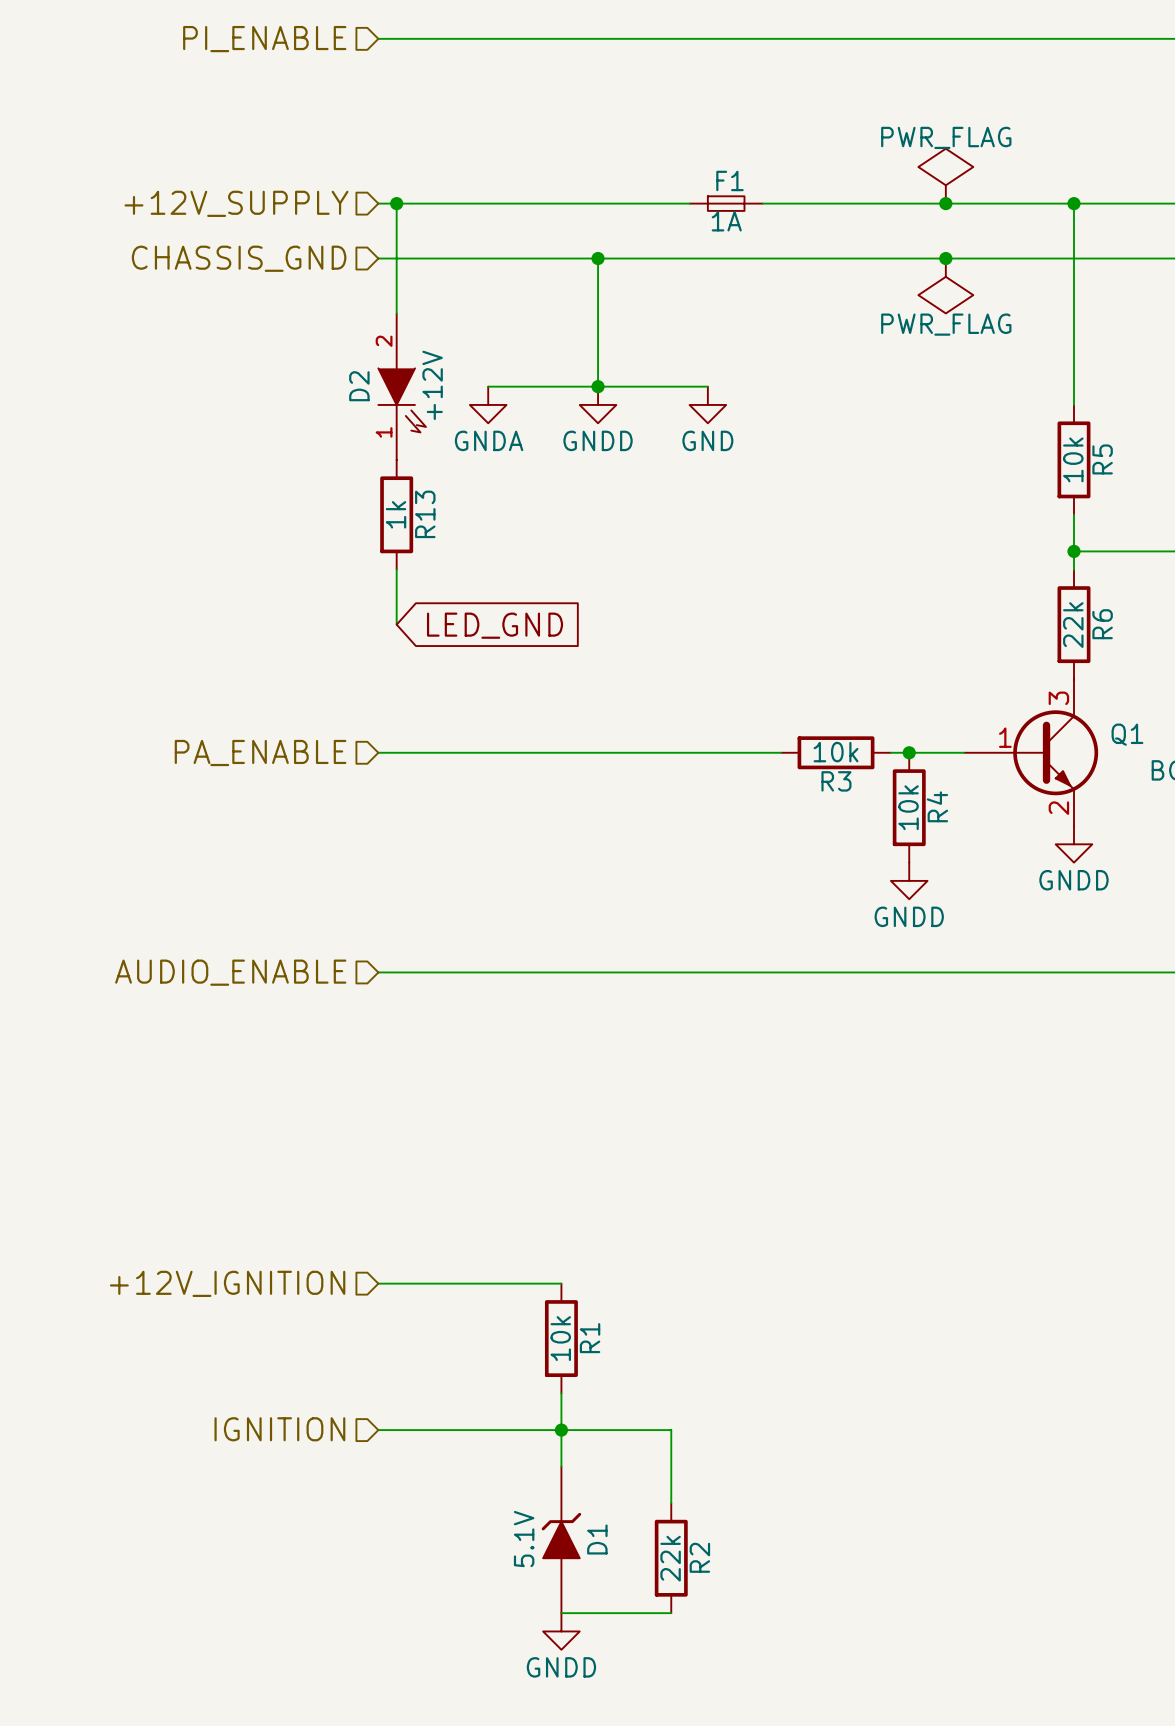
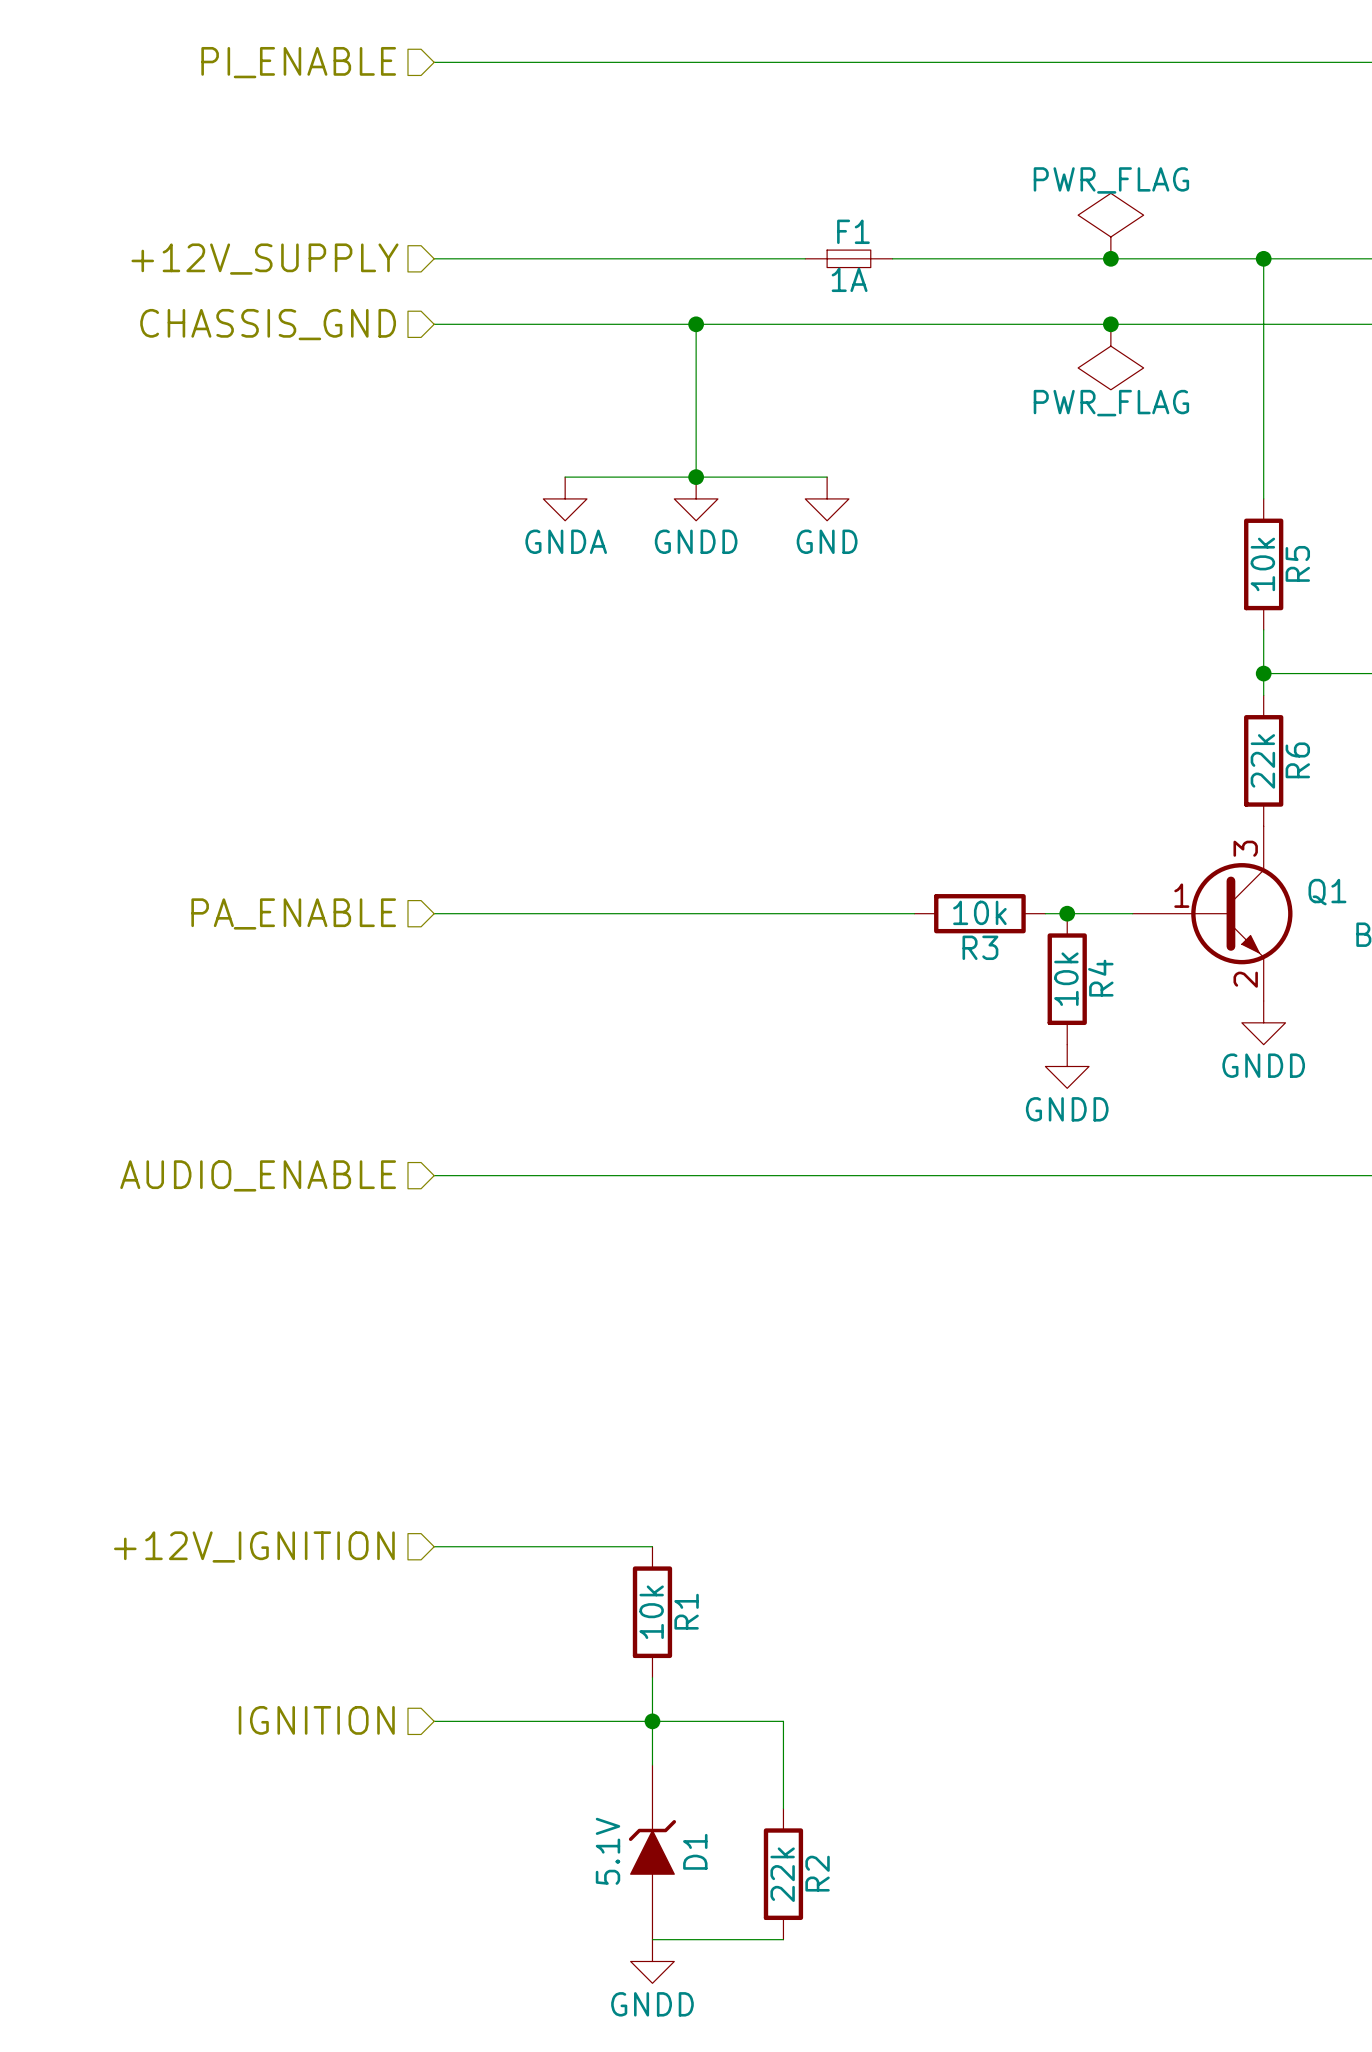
wire: (396, 203) (396, 313) -> none
junction: (396, 203) -> none
D2: +12V (402, 386) -> none
R13: 1k (396, 514) -> none
wire: (396, 569) (396, 624) -> none
global label: LED_GND (495, 625) -> none

